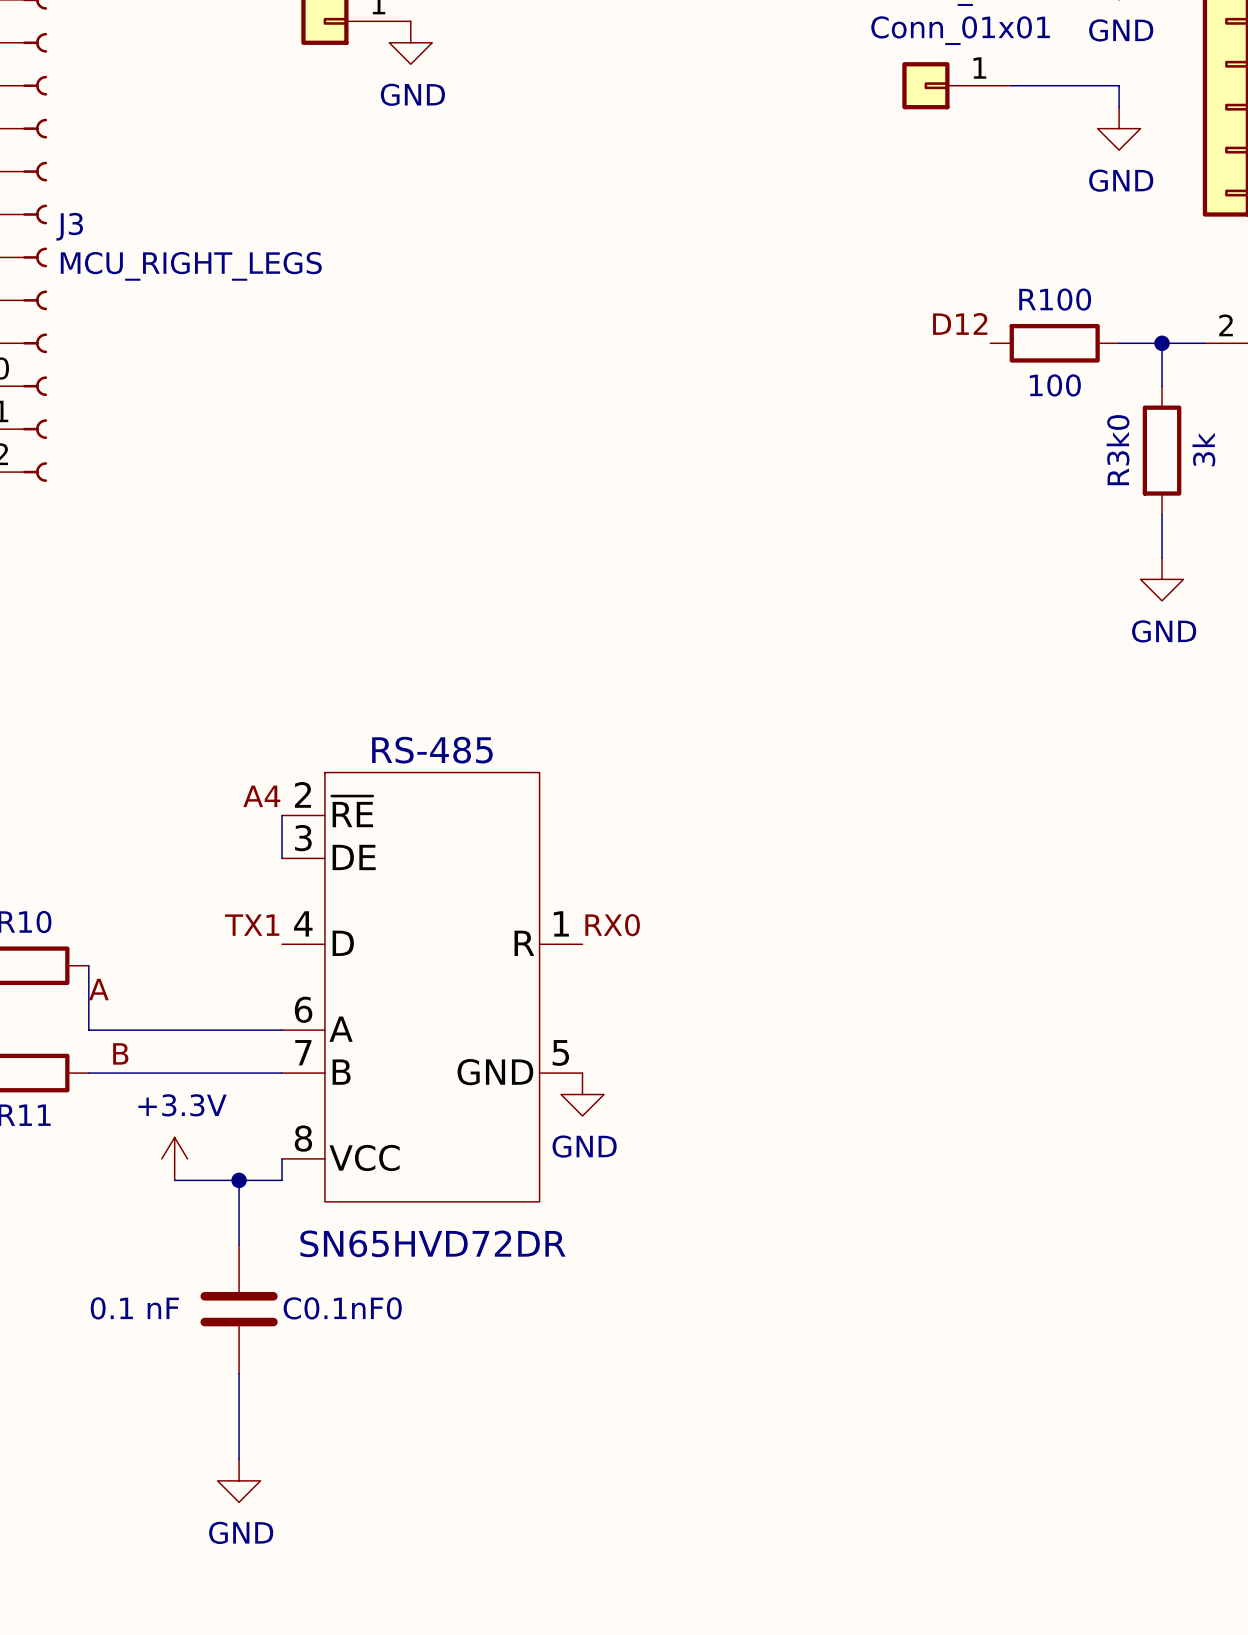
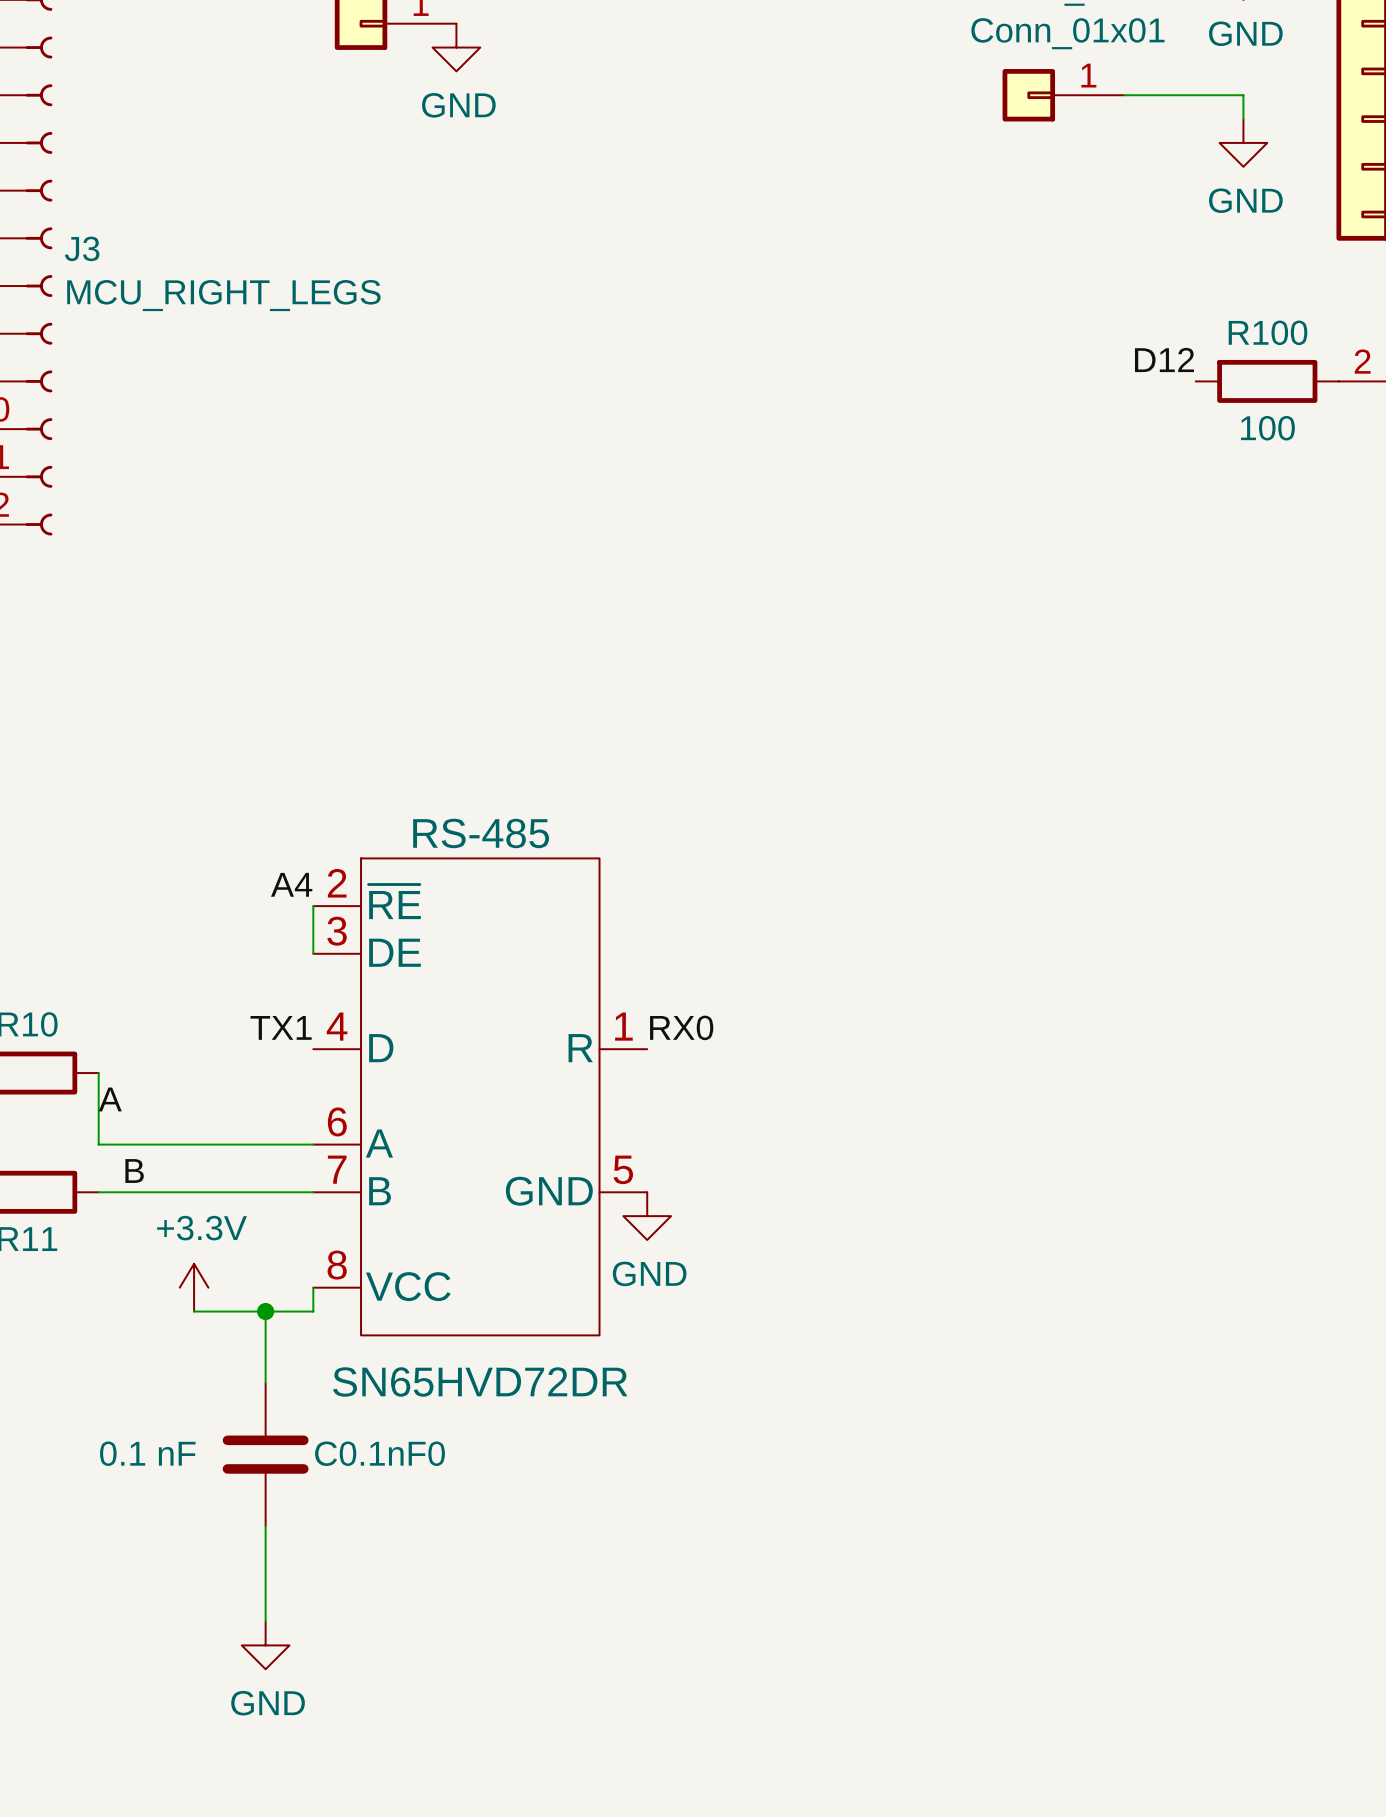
label position: D12 (960, 323) -> D12 (1164, 359)
R100 position: (1054, 343) -> (1267, 381)
wire: (1119, 343) (1204, 343) -> none
wire: (1162, 343) (1162, 386) -> none
junction: (1162, 343) -> none
R3k0: 3k (1162, 450) -> none
wire: (1162, 515) (1162, 557) -> none
power symbol: GND (1162, 579) -> none

